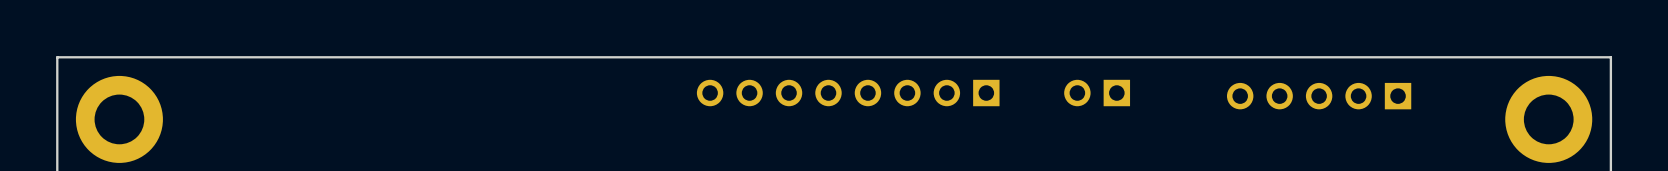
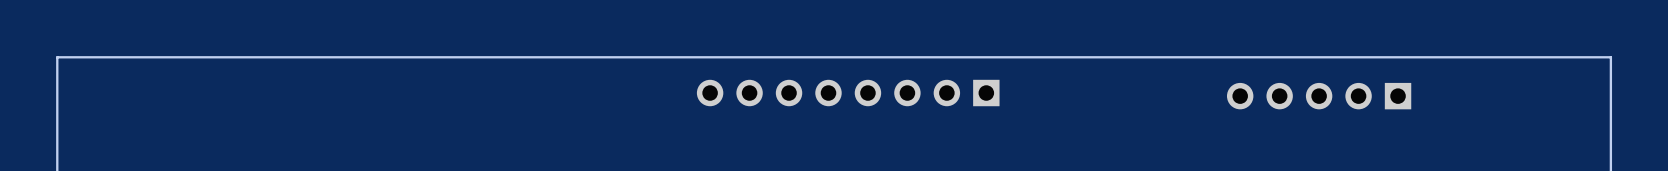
part: (1097, 93) -> none
part: (119, 119) -> none
part: (1548, 119) -> none

